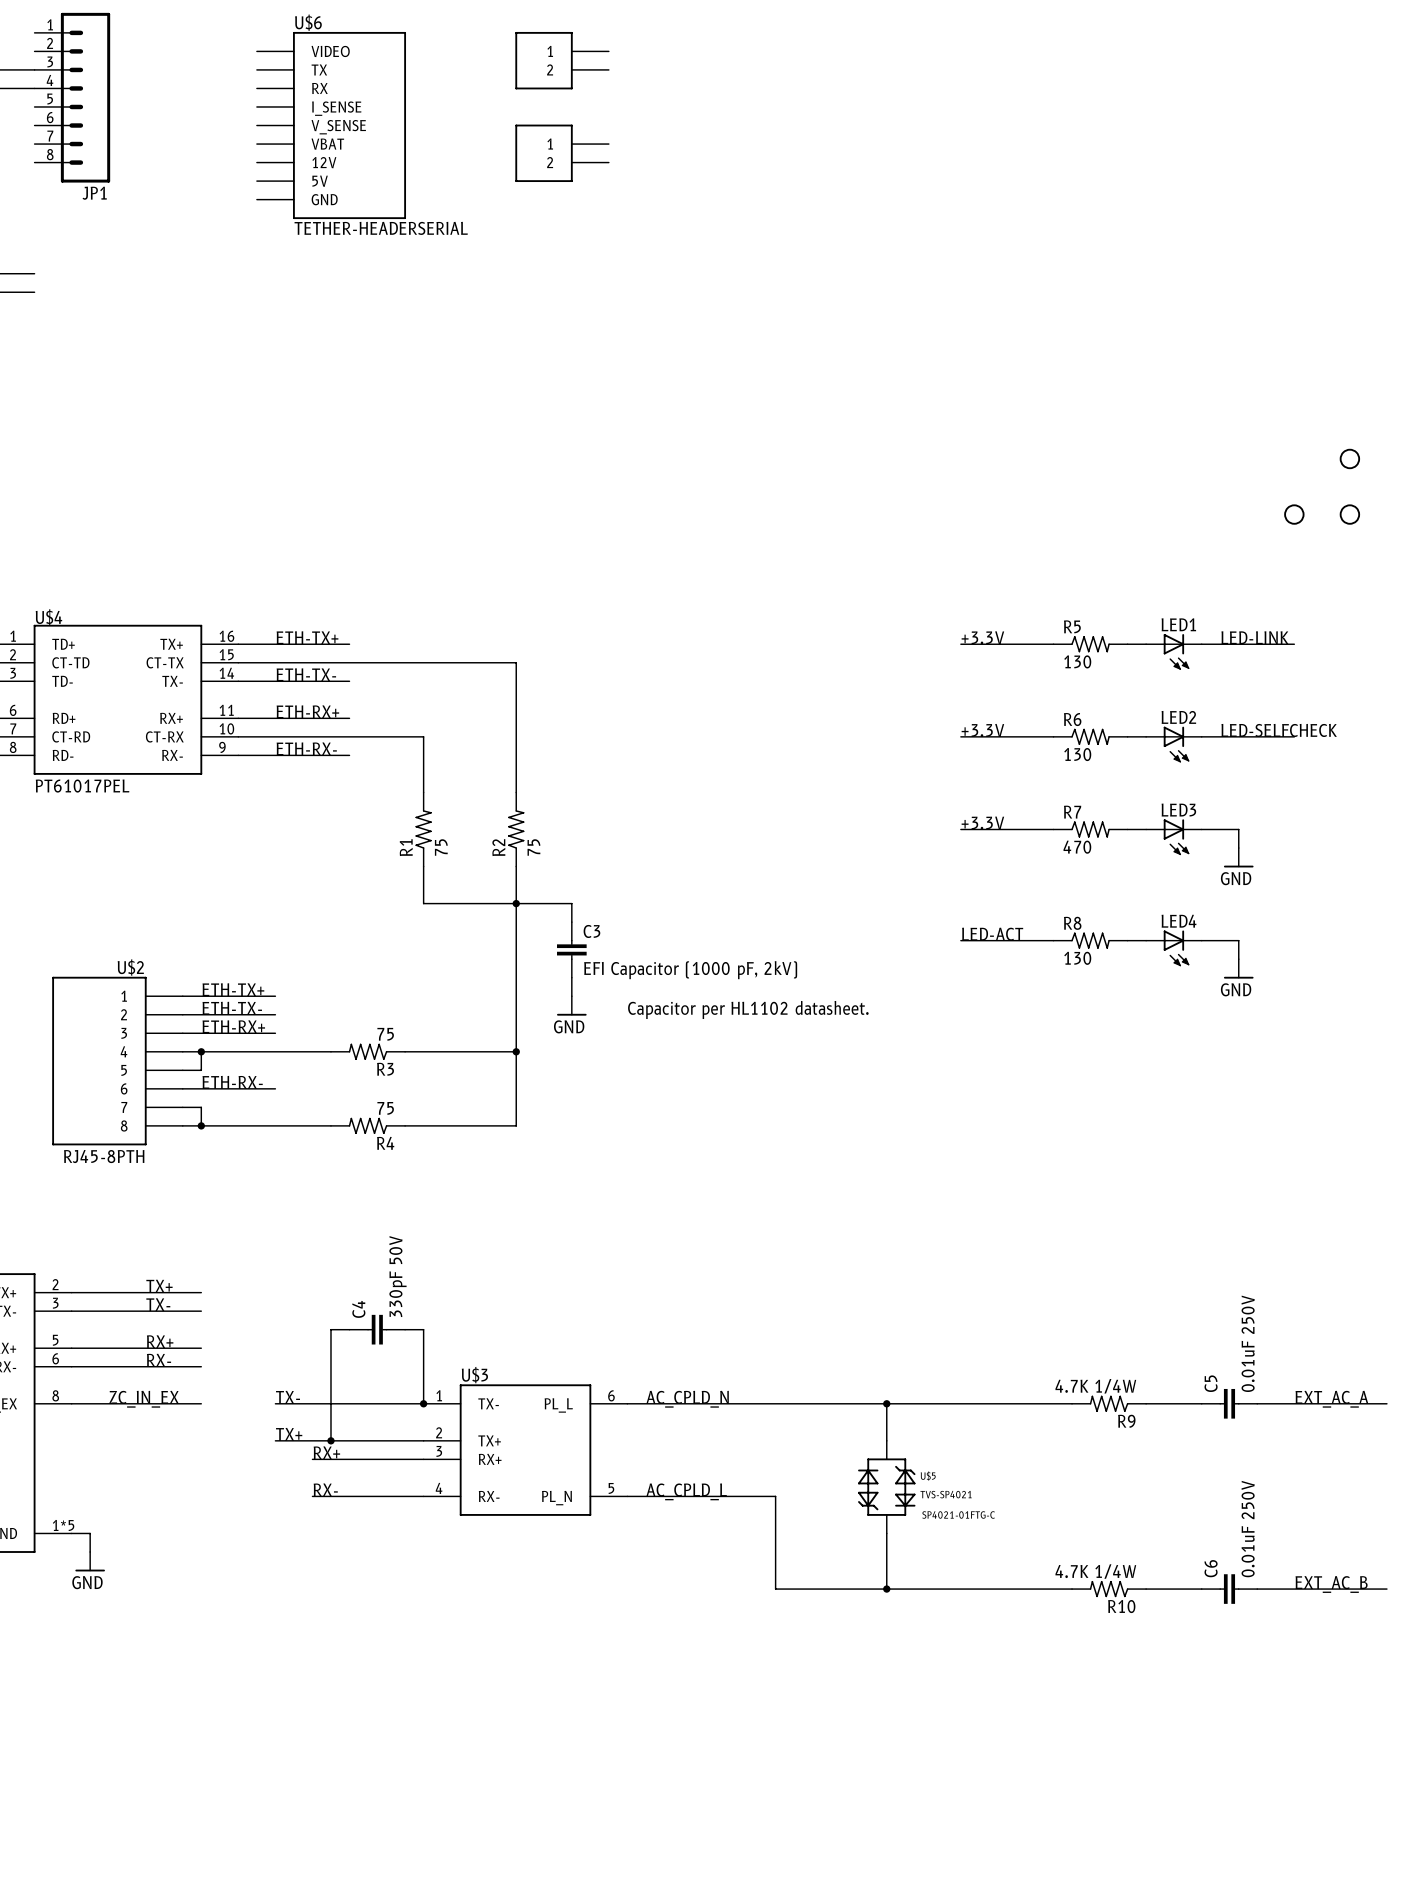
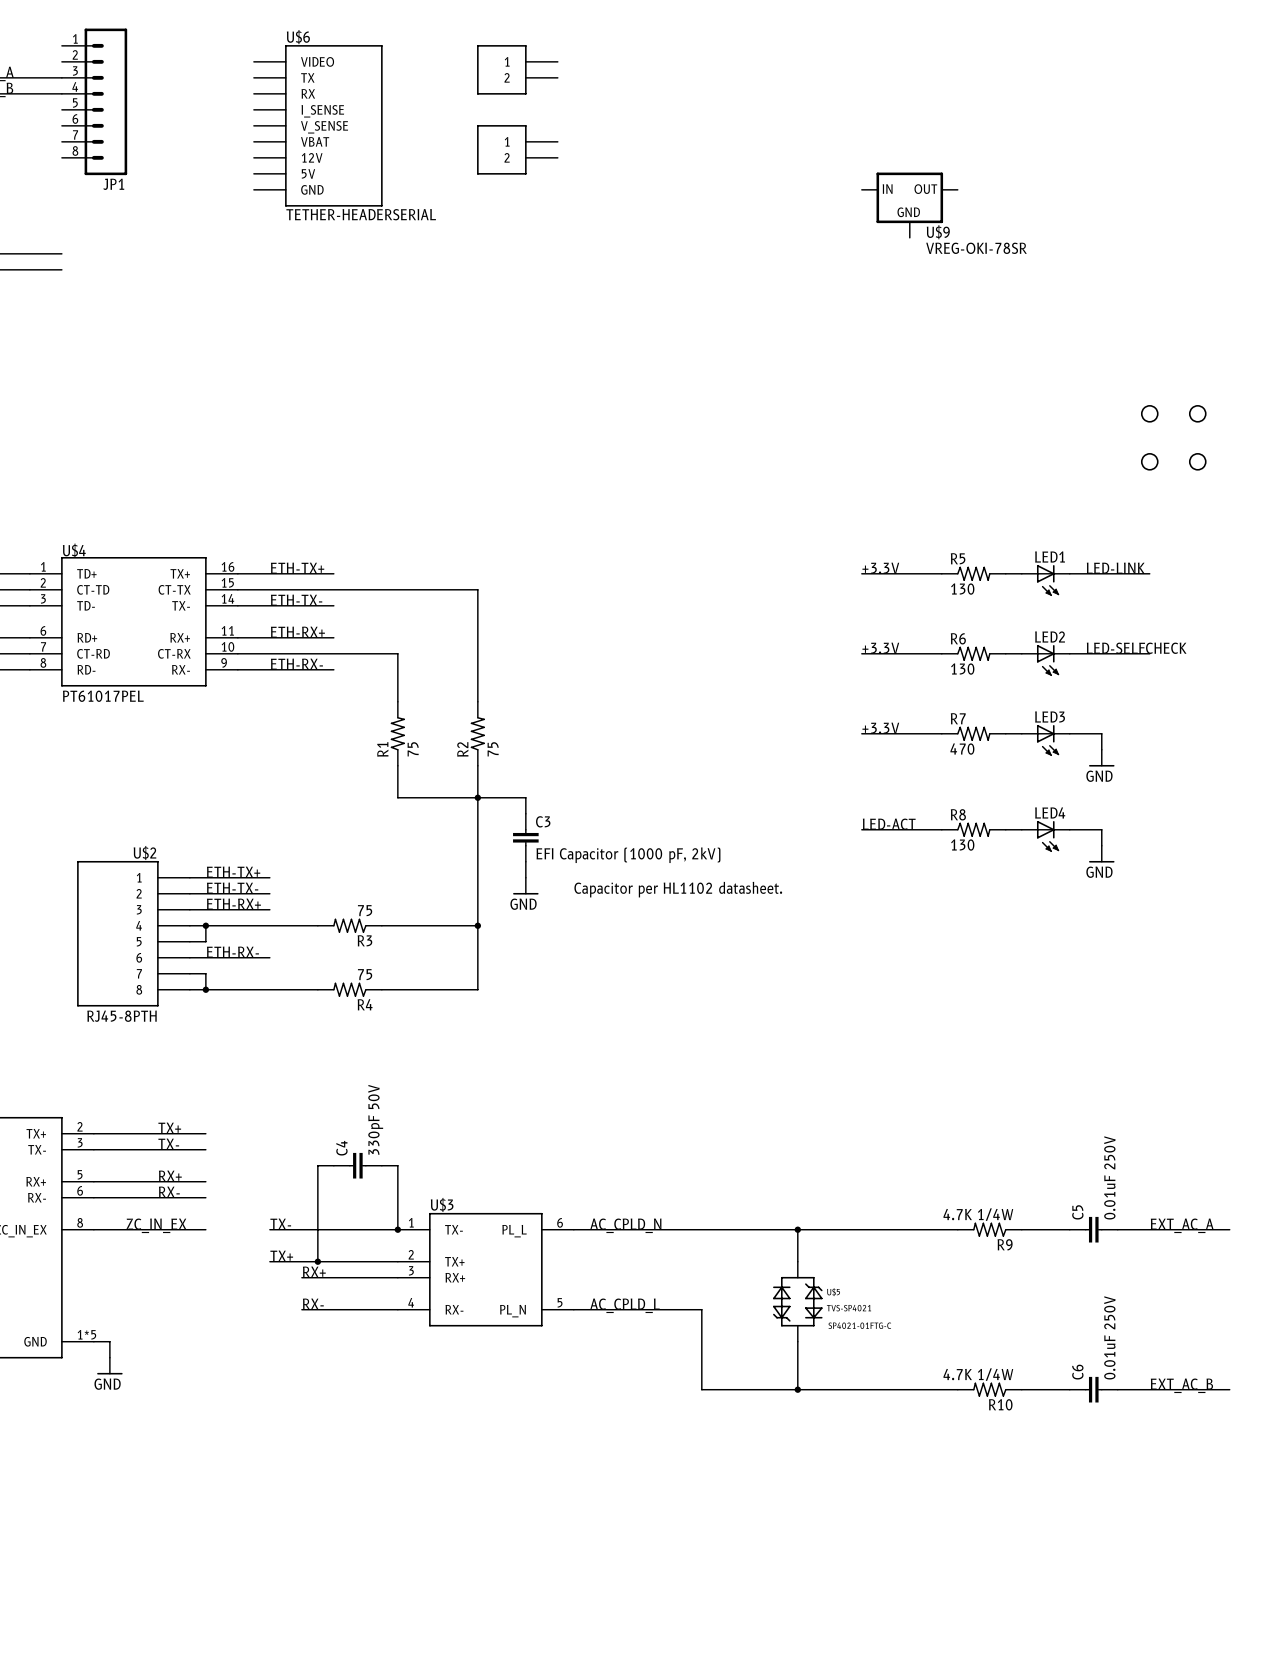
U$9: none -> VREG-OKI-78SR (909, 205)
part: none -> (1149, 413)

